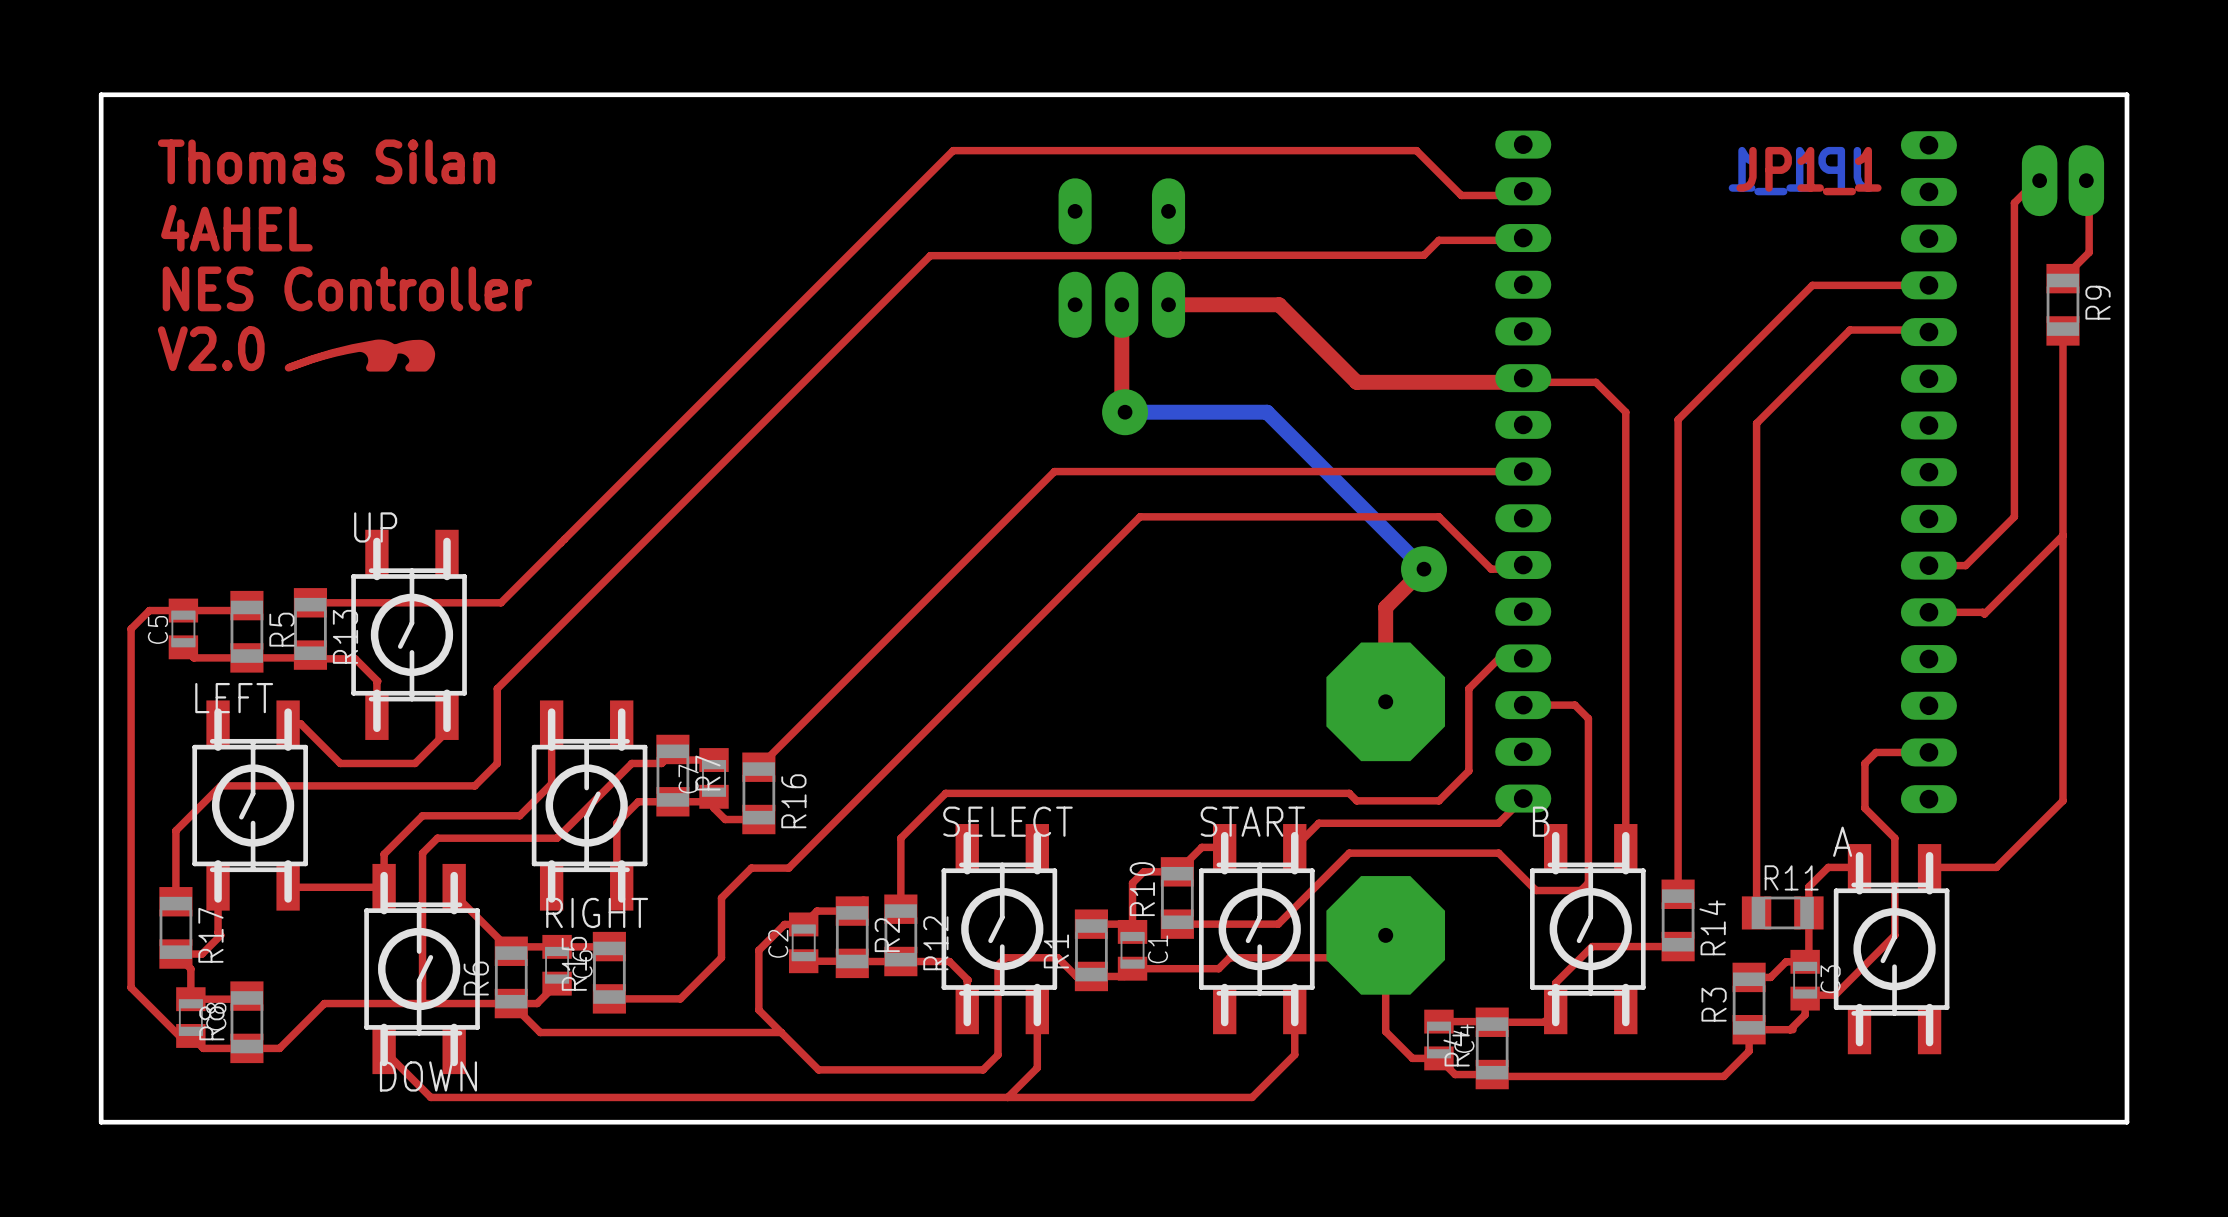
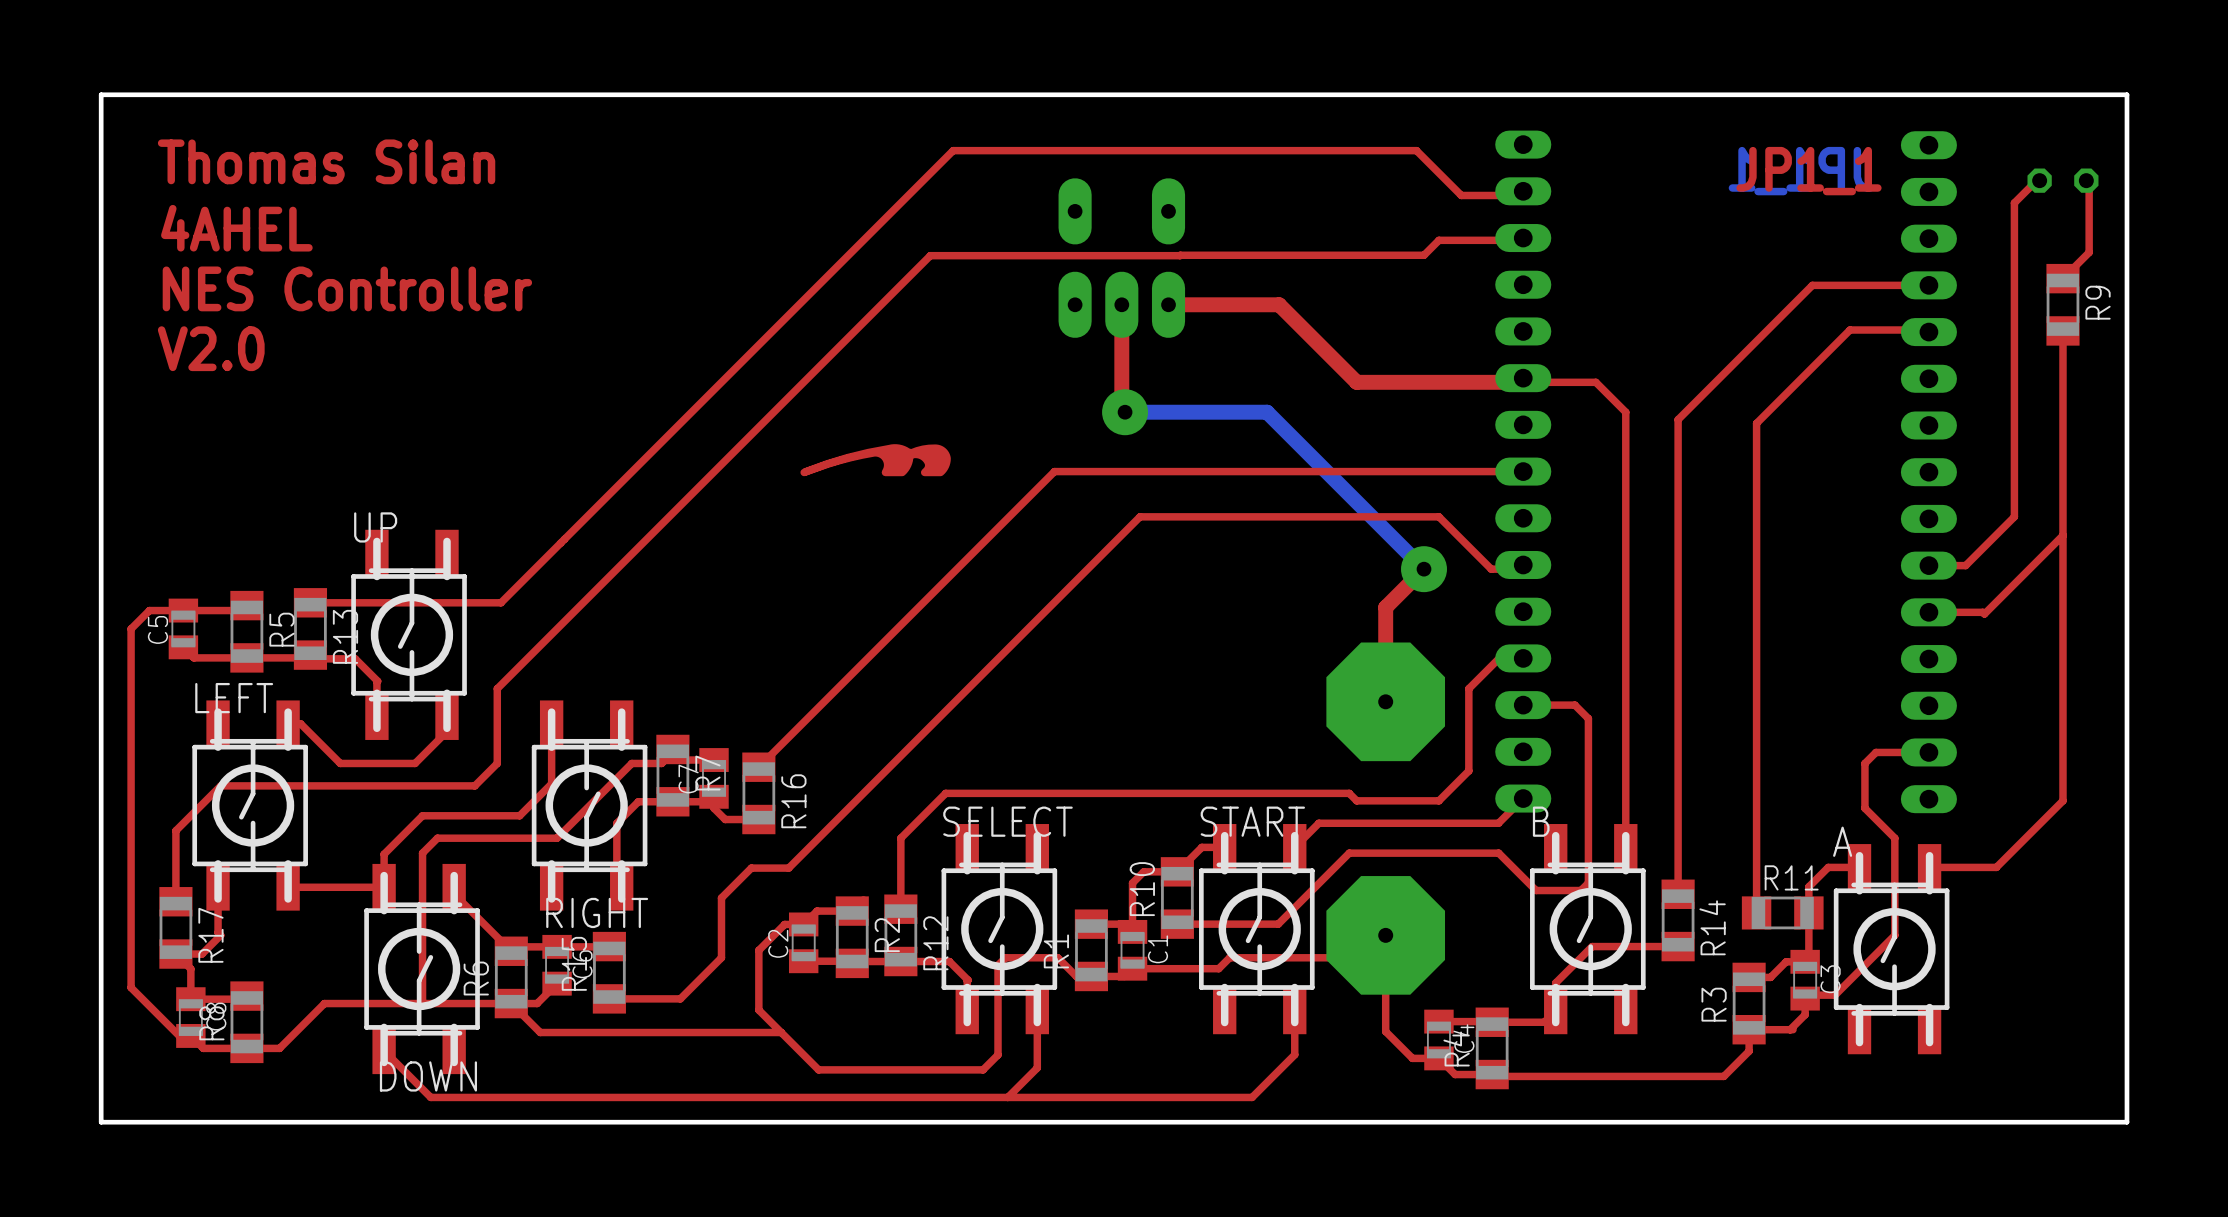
part footprint: [2021, 145, 2105, 217] -> [2027, 168, 2099, 193]
drawing: [284, 339, 436, 372] -> none
drawing: none -> [800, 444, 951, 477]

